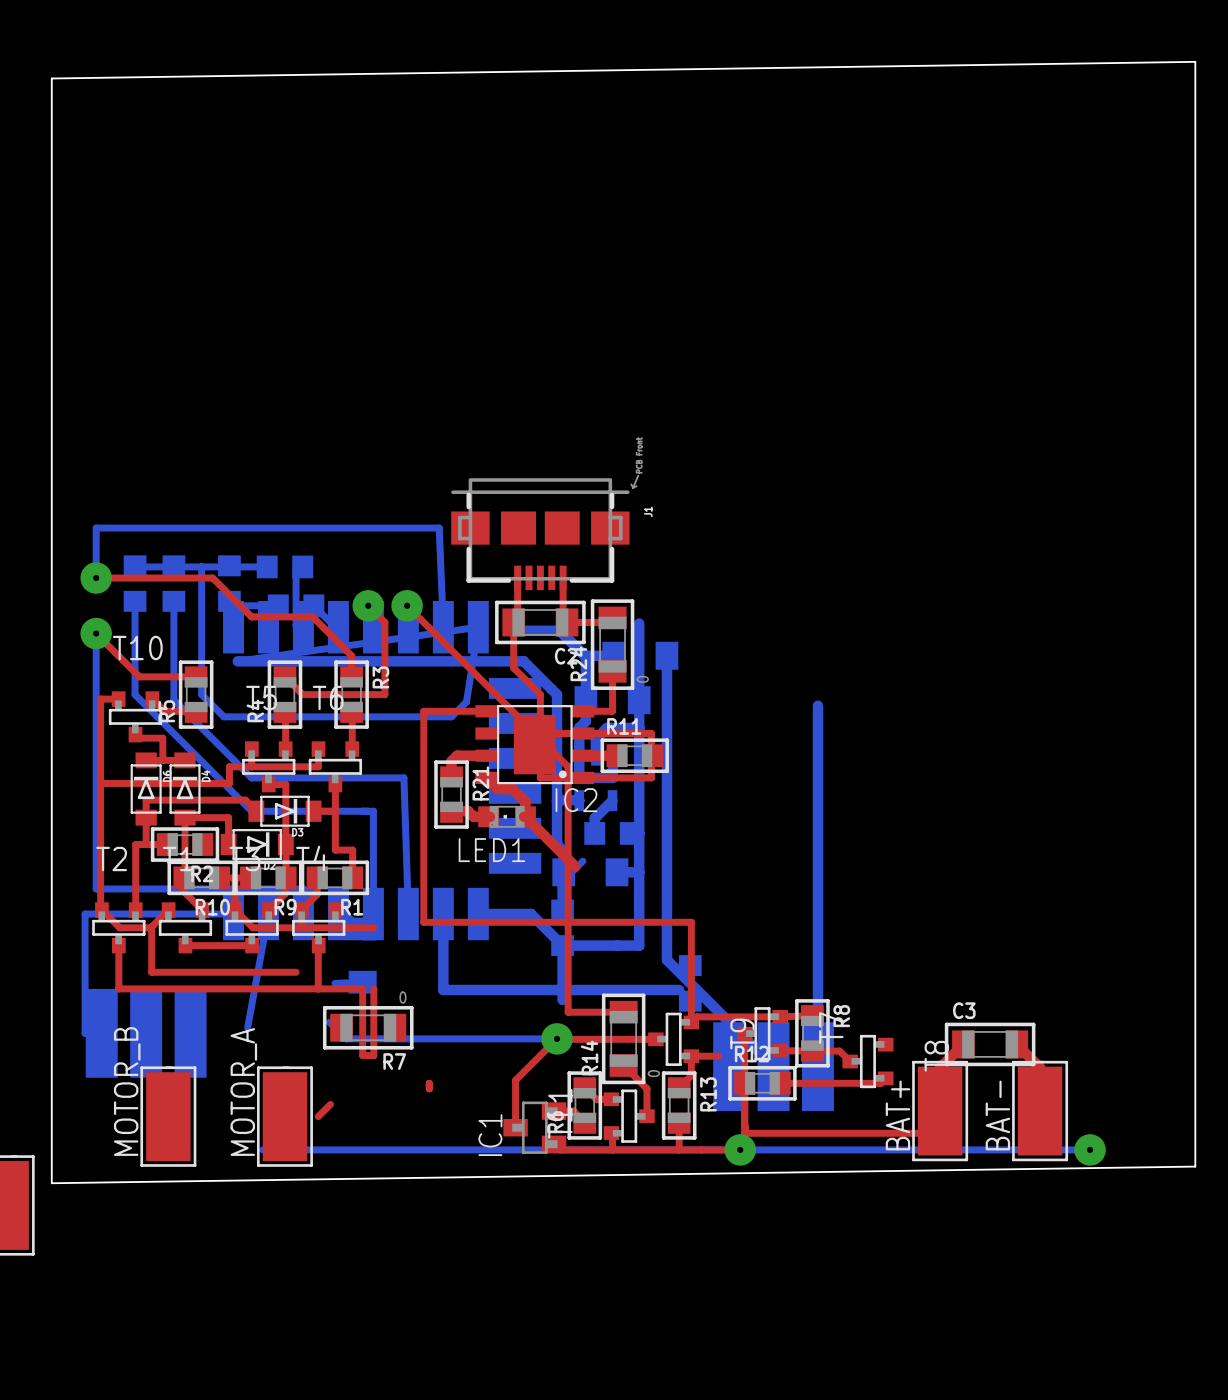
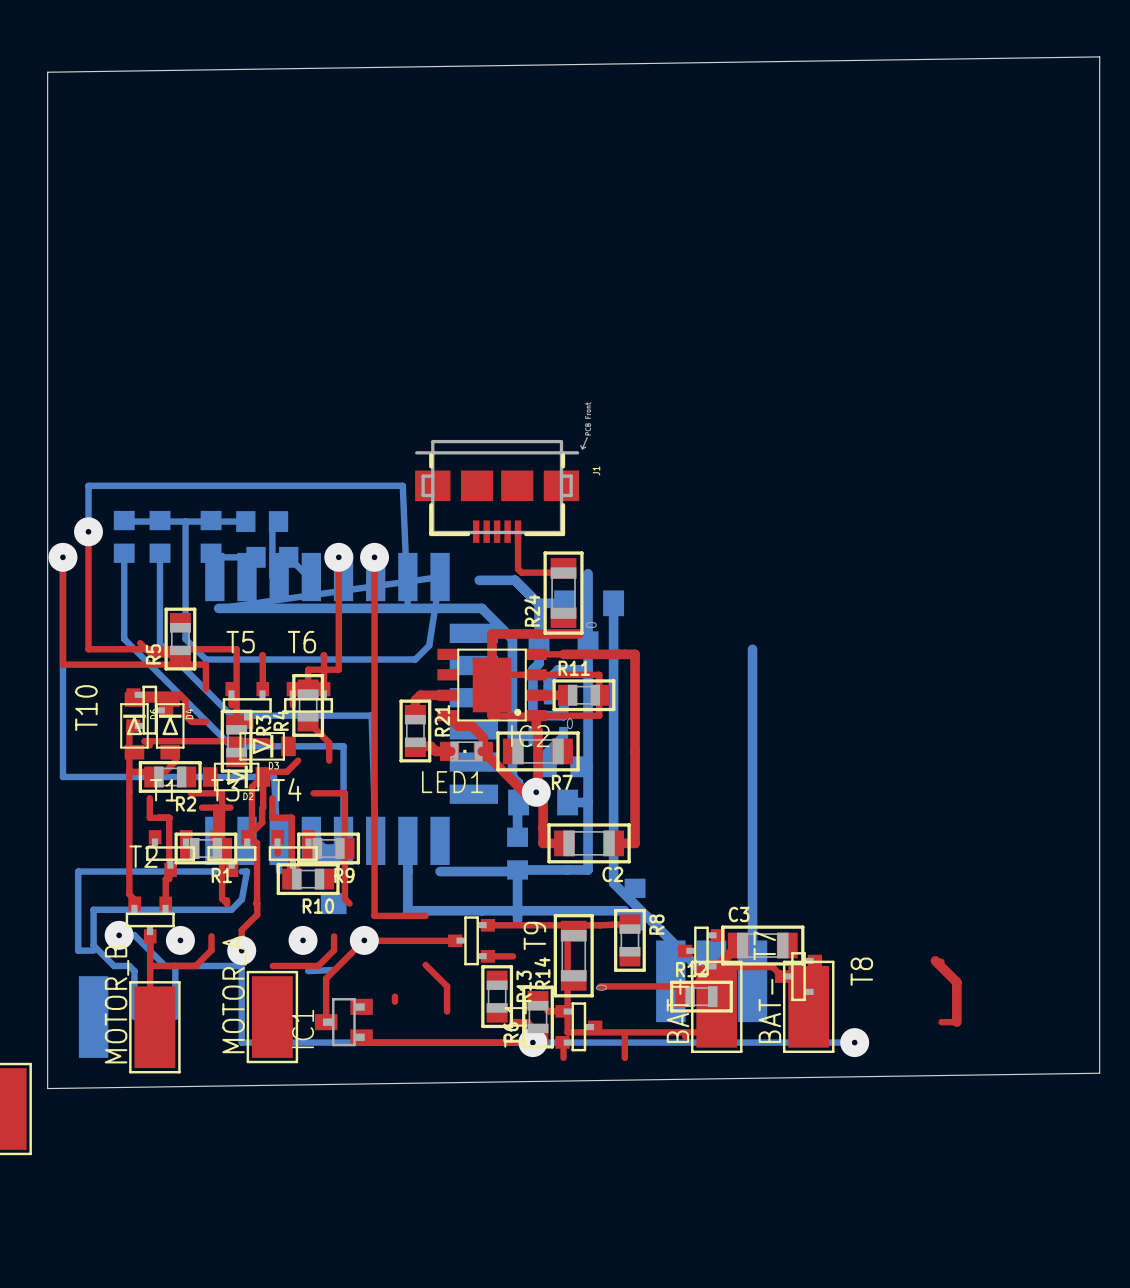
bottom track: (437, 528) (443, 627) -> (402, 485) (407, 607)
top track: (517, 577) (517, 618) (513, 622) (513, 667) (540, 694) (540, 777) -> (578, 633) (492, 633) (492, 715) (497, 715)
top track: (96, 578) (212, 578) (251, 616) (312, 616) (351, 655) (351, 676) -> (88, 531) (88, 649) (236, 649) (236, 724)
top track: none -> (62, 557) (62, 664) (205, 664) (205, 689)
bottom track: none -> (62, 557) (62, 776) (274, 776) (279, 871)
top track: (368, 605) (384, 622) (384, 694) (302, 694) (284, 676) -> (338, 557) (338, 669) (308, 669) (308, 689)
top track: (407, 605) (568, 766) (568, 1012) (623, 1012) -> (374, 557) (374, 915) (425, 915)
C2 position: (540, 622) -> (589, 843)
top track: (96, 633) (139, 676) (196, 676) -> none
bottom track: (96, 633) (96, 888) (303, 888) (303, 914) -> none
via position: (96, 633) -> (62, 557)
R4 footprint: [267, 660, 303, 729] -> [292, 673, 325, 737]
top track: (612, 671) (612, 711) -> (613, 843) (635, 843) (635, 654) (563, 654)
R3 position: (351, 694) -> (236, 741)
top track: (118, 699) (100, 699) (101, 910) -> none
top track: (486, 711) (423, 711) (423, 922) (691, 922) (691, 1022) (696, 1016) (812, 1015) -> none
T10 rotation: 0° (135, 716) -> 90° counterclockwise (149, 710)
T10 position: (135, 716) -> (149, 710)
top track: (135, 734) (139, 738) (162, 738) (162, 760) -> none
top track: none -> (133, 694) (179, 694) (185, 700) (185, 715) (191, 721) (205, 721)
top track: (318, 766) (229, 766) (229, 783) (100, 783) -> none
top track: none -> (536, 715) (536, 729) (538, 731) (538, 790) (536, 792) (543, 799) (543, 843) (564, 843)
top track: (268, 784) (285, 784) (285, 844) -> none
top track: (335, 784) (335, 850) (352, 850) (352, 877) -> (308, 721) (329, 742) (329, 760)
top track: none -> (133, 725) (129, 726) (129, 894) (134, 899) (134, 903)
top track: none -> (149, 745) (144, 741) (267, 741) (272, 745)
top track: (256, 811) (245, 800) (146, 800) (146, 844) -> none
top track: (313, 811) (335, 811) -> none
top track: none -> (175, 760) (165, 771) (129, 771)
top track: none -> (298, 760) (286, 771) (267, 771) (251, 787) (251, 838) (257, 843) (257, 903)
top track: (167, 844) (135, 844) (135, 910) -> none
top track: (228, 844) (228, 817) (185, 817) (183, 888) -> none
via: none -> (536, 792)
top track: none -> (191, 793) (222, 793) (222, 898) (227, 903) (227, 900)
top track: none -> (313, 793) (344, 793) (344, 898) (349, 903)
top track: none -> (149, 798) (149, 817) (169, 817) (158, 817)
top track: none -> (272, 798) (272, 817) (292, 817) (281, 818)
R10 position: (201, 877) -> (308, 879)
R9 position: (268, 877) -> (328, 848)
R1 position: (334, 877) -> (205, 848)
top track: (183, 891) (202, 909) -> (169, 820) (169, 879) (165, 879) (165, 903)
top track: (317, 894) (301, 910) -> (291, 822) (291, 879)
top track: (101, 905) (101, 909) (119, 927) (151, 927) -> none
top track: (168, 910) (151, 926) (151, 972) (296, 972) -> none
top track: (233, 910) (252, 927) (373, 927) -> none
bottom track: (233, 914) (85, 914) (85, 947) -> (214, 871) (78, 871)
bottom track: (262, 914) (268, 914) (247, 1027) -> none
bottom track: (478, 914) (531, 914) (562, 945) -> (440, 871) (515, 871) (517, 869)
T2 position: (118, 927) -> (150, 919)
top track: (118, 945) (118, 988) (362, 988) (362, 1055) (373, 1055) (373, 988) -> none
top track: (185, 945) (252, 945) -> none
top track: (318, 945) (318, 988) -> none
bottom track: none -> (241, 871) (247, 871) (241, 899) (231, 909) (93, 909) (93, 945) (114, 965) (129, 965) (134, 971) (134, 1017)
top track: none -> (256, 903) (257, 914)
bottom track: (362, 982) (334, 983) -> (333, 970) (308, 971)
top track: none -> (257, 914) (241, 930) (241, 950)
top track: none -> (629, 924) (487, 925)
bottom track: none -> (119, 935) (134, 935) (165, 965)
via: none -> (119, 935)
top track: none -> (150, 936) (149, 1017)
top track: none -> (211, 936) (211, 950) (195, 965) (150, 965)
top track: none -> (334, 936) (334, 950) (318, 965) (272, 965)
via: none -> (180, 940)
bottom track: (329, 1022) (346, 1038) (557, 1038) -> none
via: none -> (303, 940)
via: none -> (364, 940)
top track: none -> (455, 940) (359, 940) (364, 940) (326, 978) (326, 1022)
top track: none -> (567, 940) (567, 1032) (716, 1032) (716, 966) (738, 945)
R7 position: (368, 1027) -> (538, 751)
part: (101, 1033) -> none
part: (146, 1033) -> none
part: (190, 1033) -> none
via: none -> (241, 950)
top track: (744, 1033) (744, 1133) (940, 1133) (940, 1067) (963, 1044) -> none
R8 position: (812, 1033) -> (629, 940)
via: (557, 1038) -> none
top track: none -> (487, 956) (513, 956)
top track: (655, 1039) (556, 1039) (515, 1080) (515, 1127) -> none
T9 position: (673, 1039) -> (471, 940)
C3 position: (990, 1044) -> (762, 945)
top track: (718, 1056) (691, 1056) (691, 1075) (679, 1087) -> none
top track: (623, 1065) (646, 1088) (646, 1116) -> (425, 964) (447, 986) (447, 1011)
top track: (885, 1078) (880, 1083) (780, 1083) -> (697, 981) (692, 986) (600, 986)
top track: (330, 1104) (318, 1116) -> none
part: none -> (93, 1017)
bottom track: none -> (175, 1017) (175, 965) (241, 965) (241, 1042) (854, 1042)
R13 position: (679, 1105) -> (497, 996)
BAT+ position: (940, 1111) -> (716, 1006)
BAT- position: (1040, 1111) -> (808, 1006)
MOTOR_A position: (284, 1116) -> (272, 1017)
IC1 position: (534, 1127) -> (343, 1022)
via: none -> (532, 1042)
via: none -> (854, 1042)
top track: (554, 1144) (559, 1149) (740, 1149) -> (361, 1037) (366, 1042) (532, 1042)
bottom track: (262, 1149) (1090, 1149) -> none
via: (740, 1149) -> none
via: (1090, 1149) -> none

